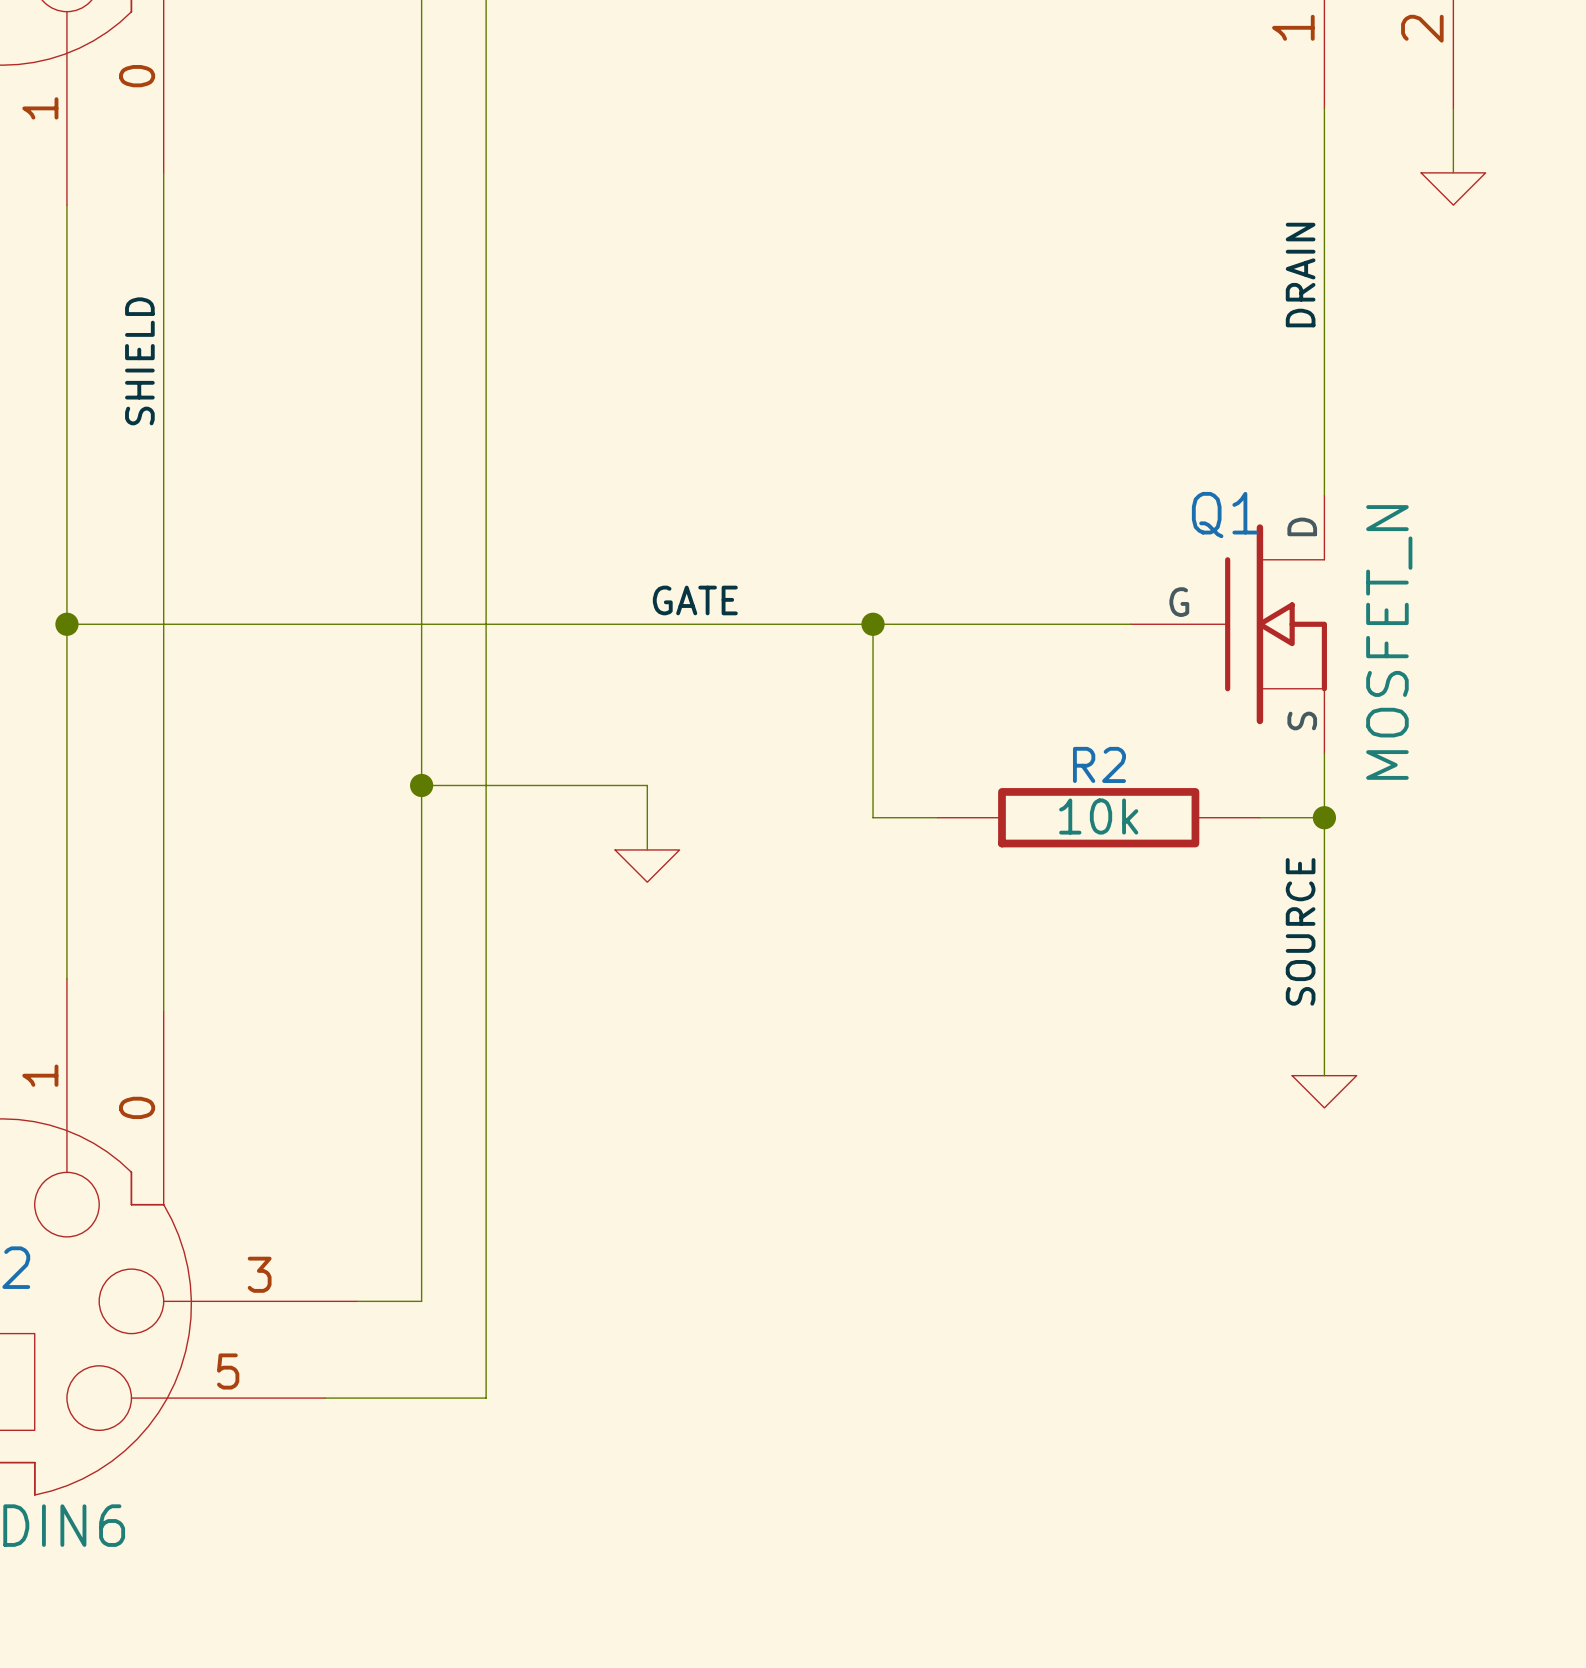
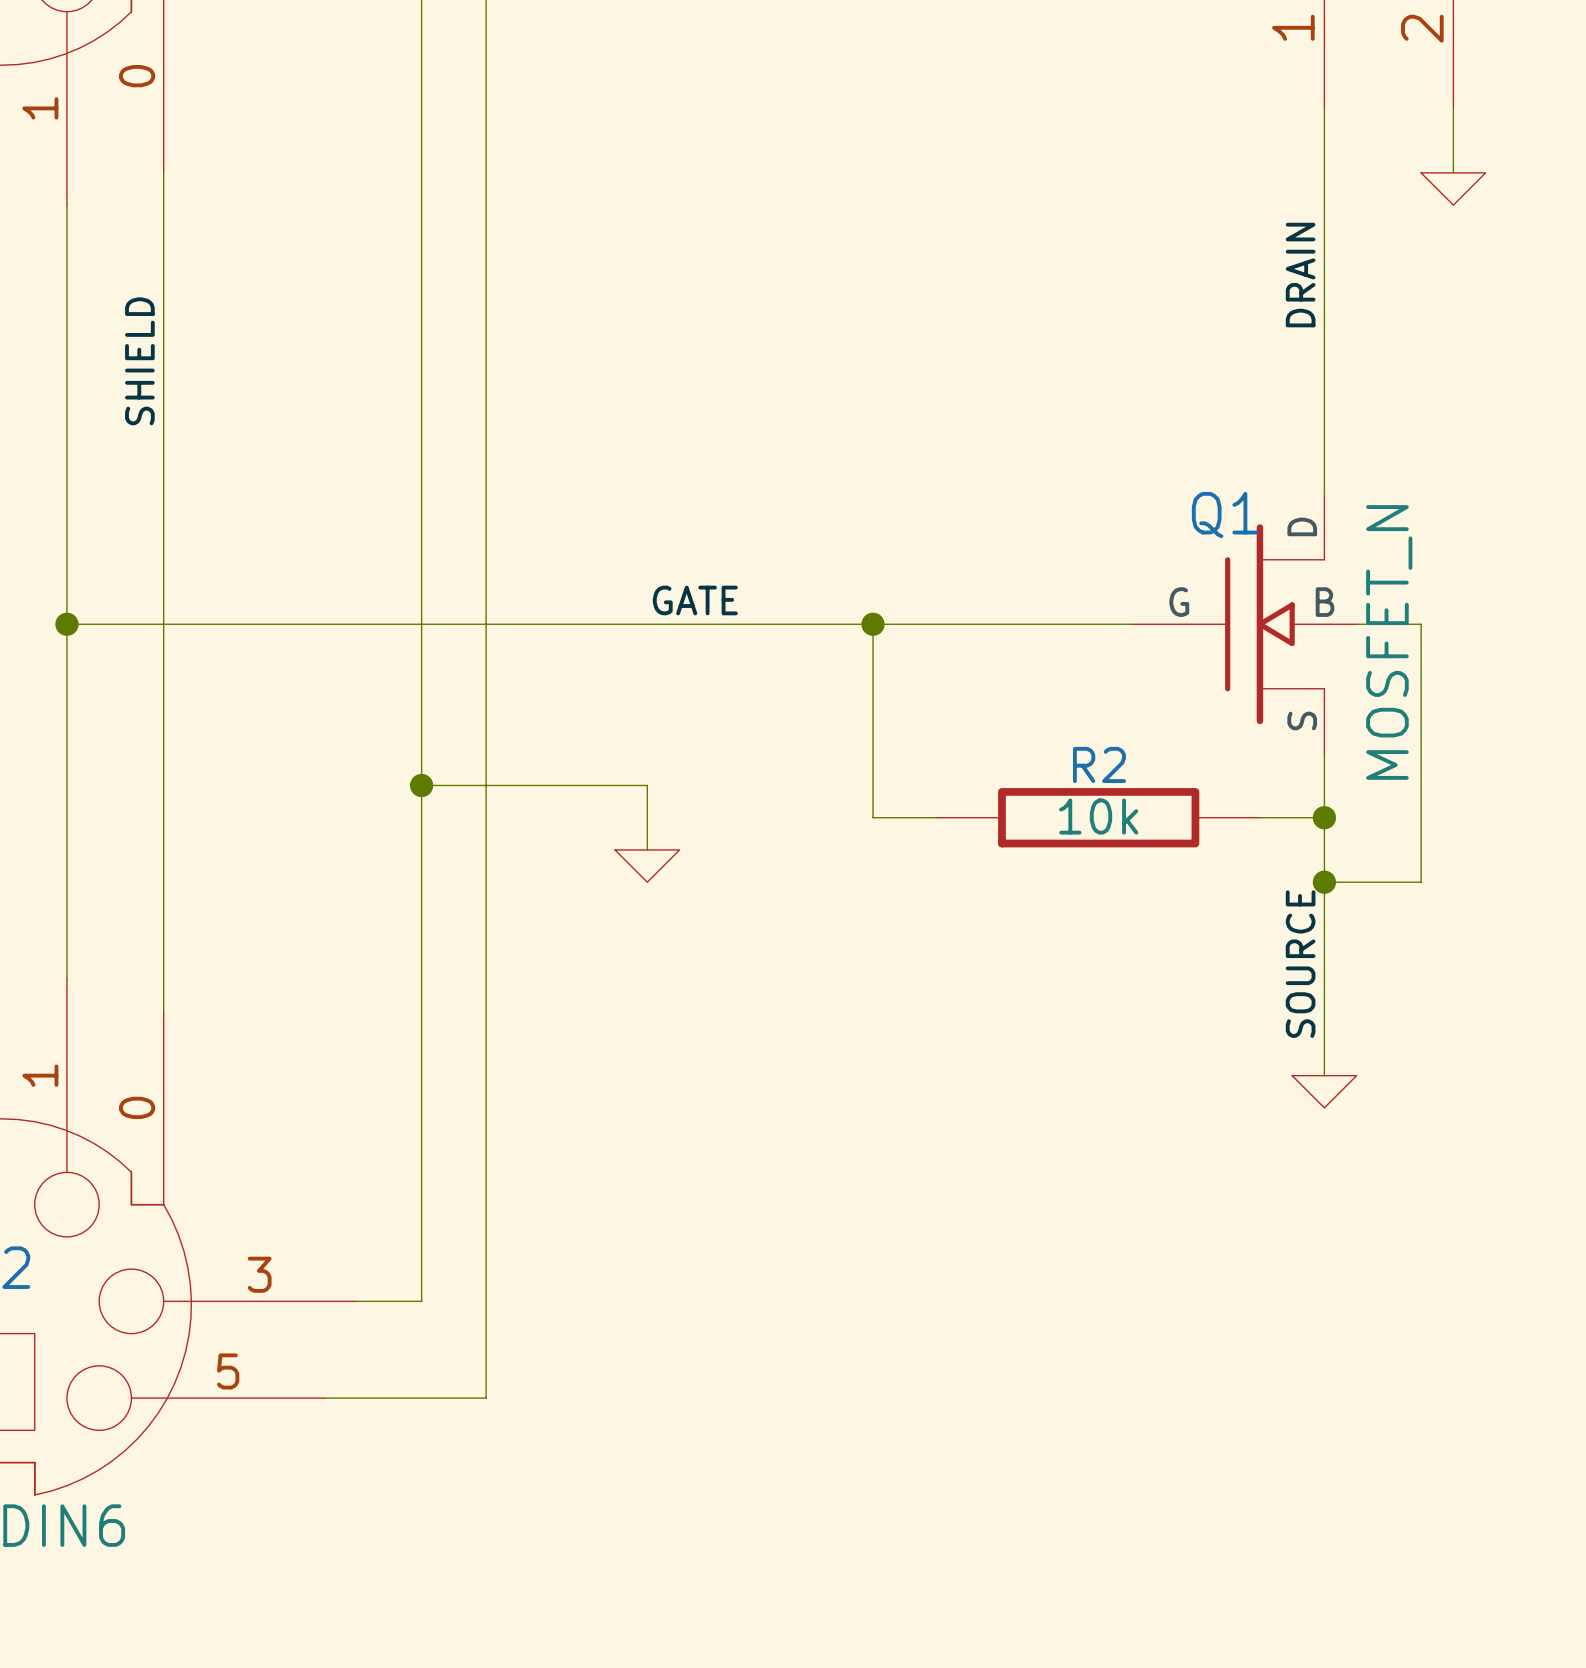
Q1 symbol: [1130, 495, 1327, 754] -> [1130, 495, 1357, 754]
wire: none -> (1356, 624) (1421, 624) (1421, 882) (1324, 882)
junction: none -> (1324, 882)
label position: SOURCE (1300, 931) -> SOURCE (1300, 964)

